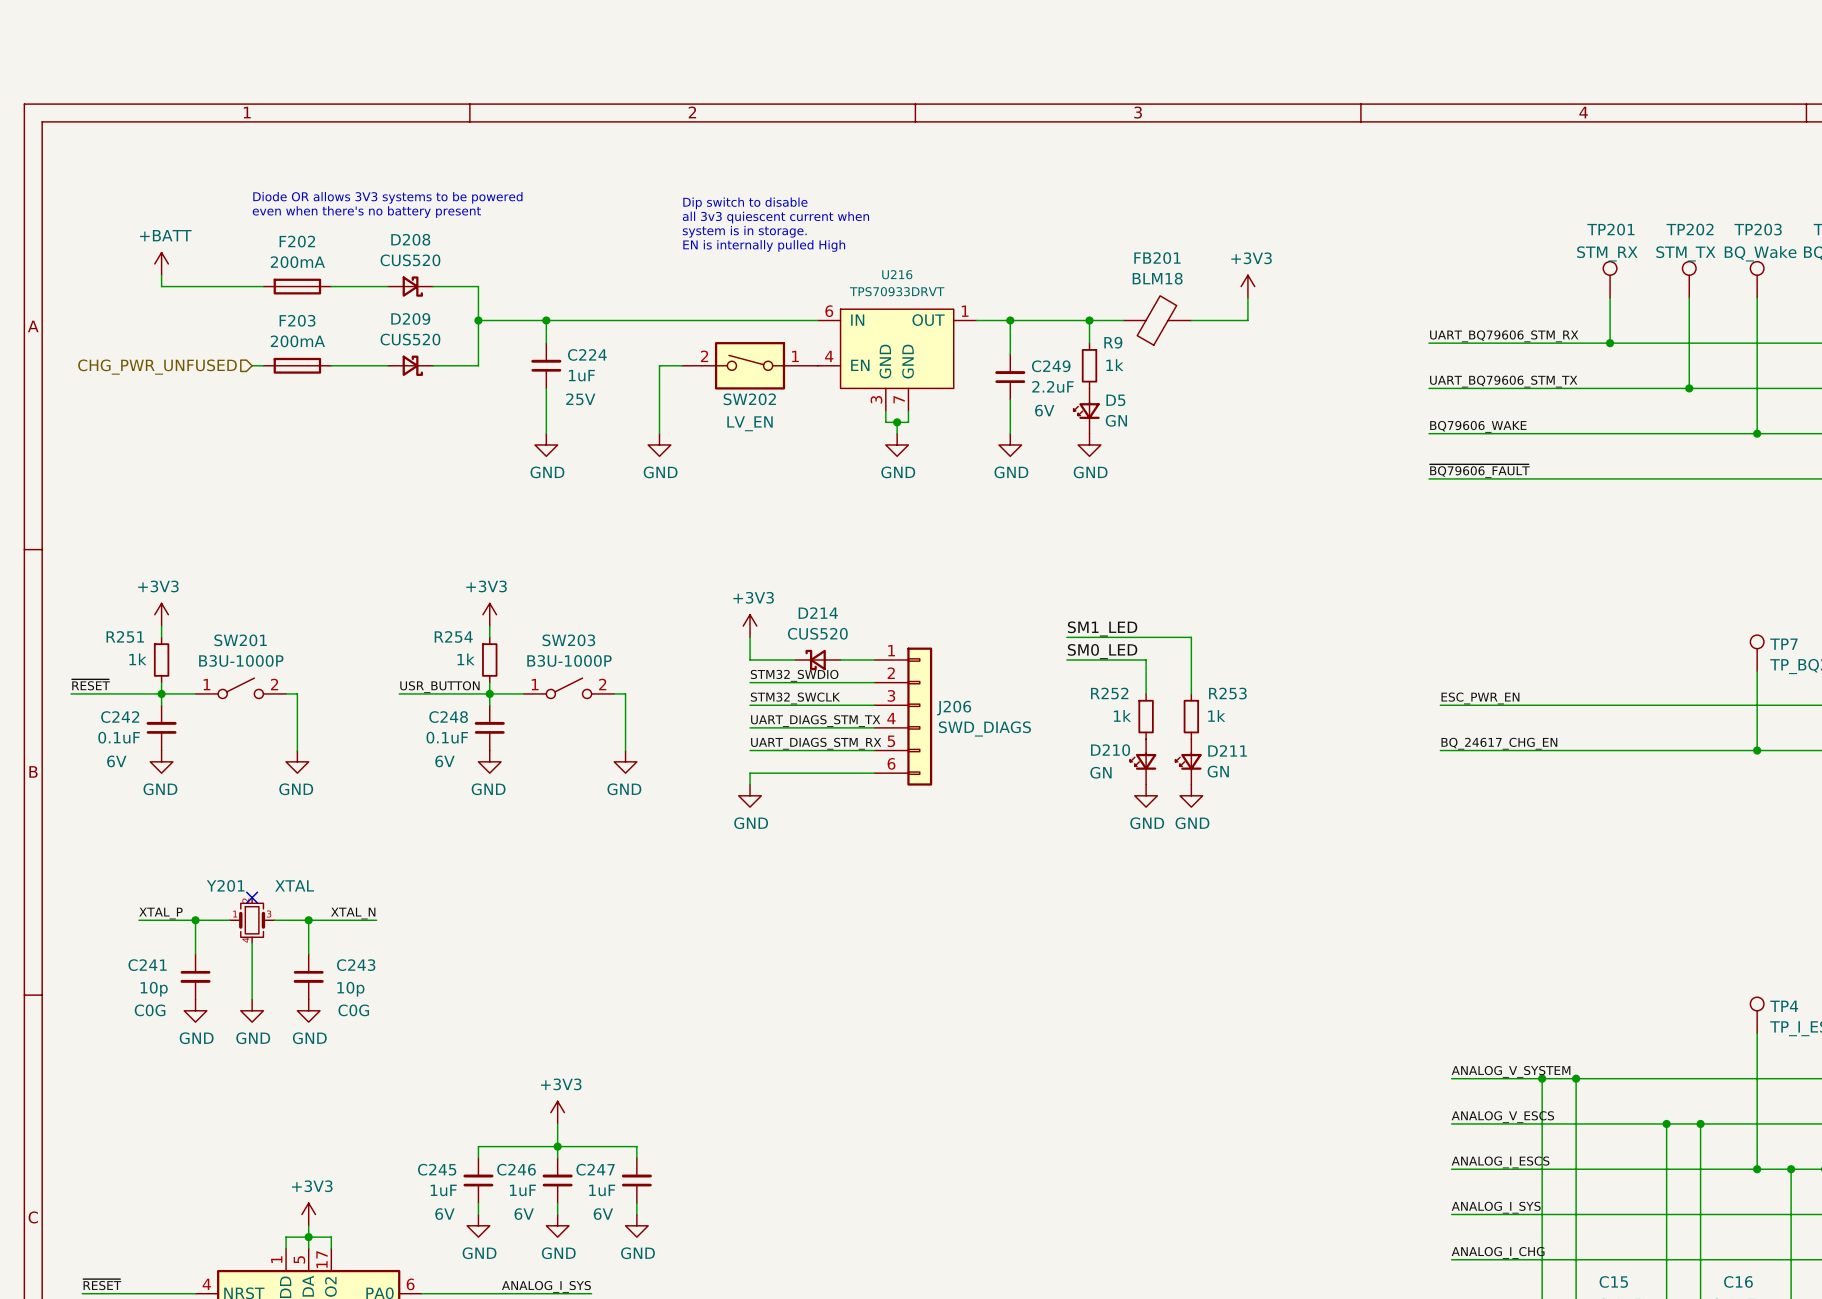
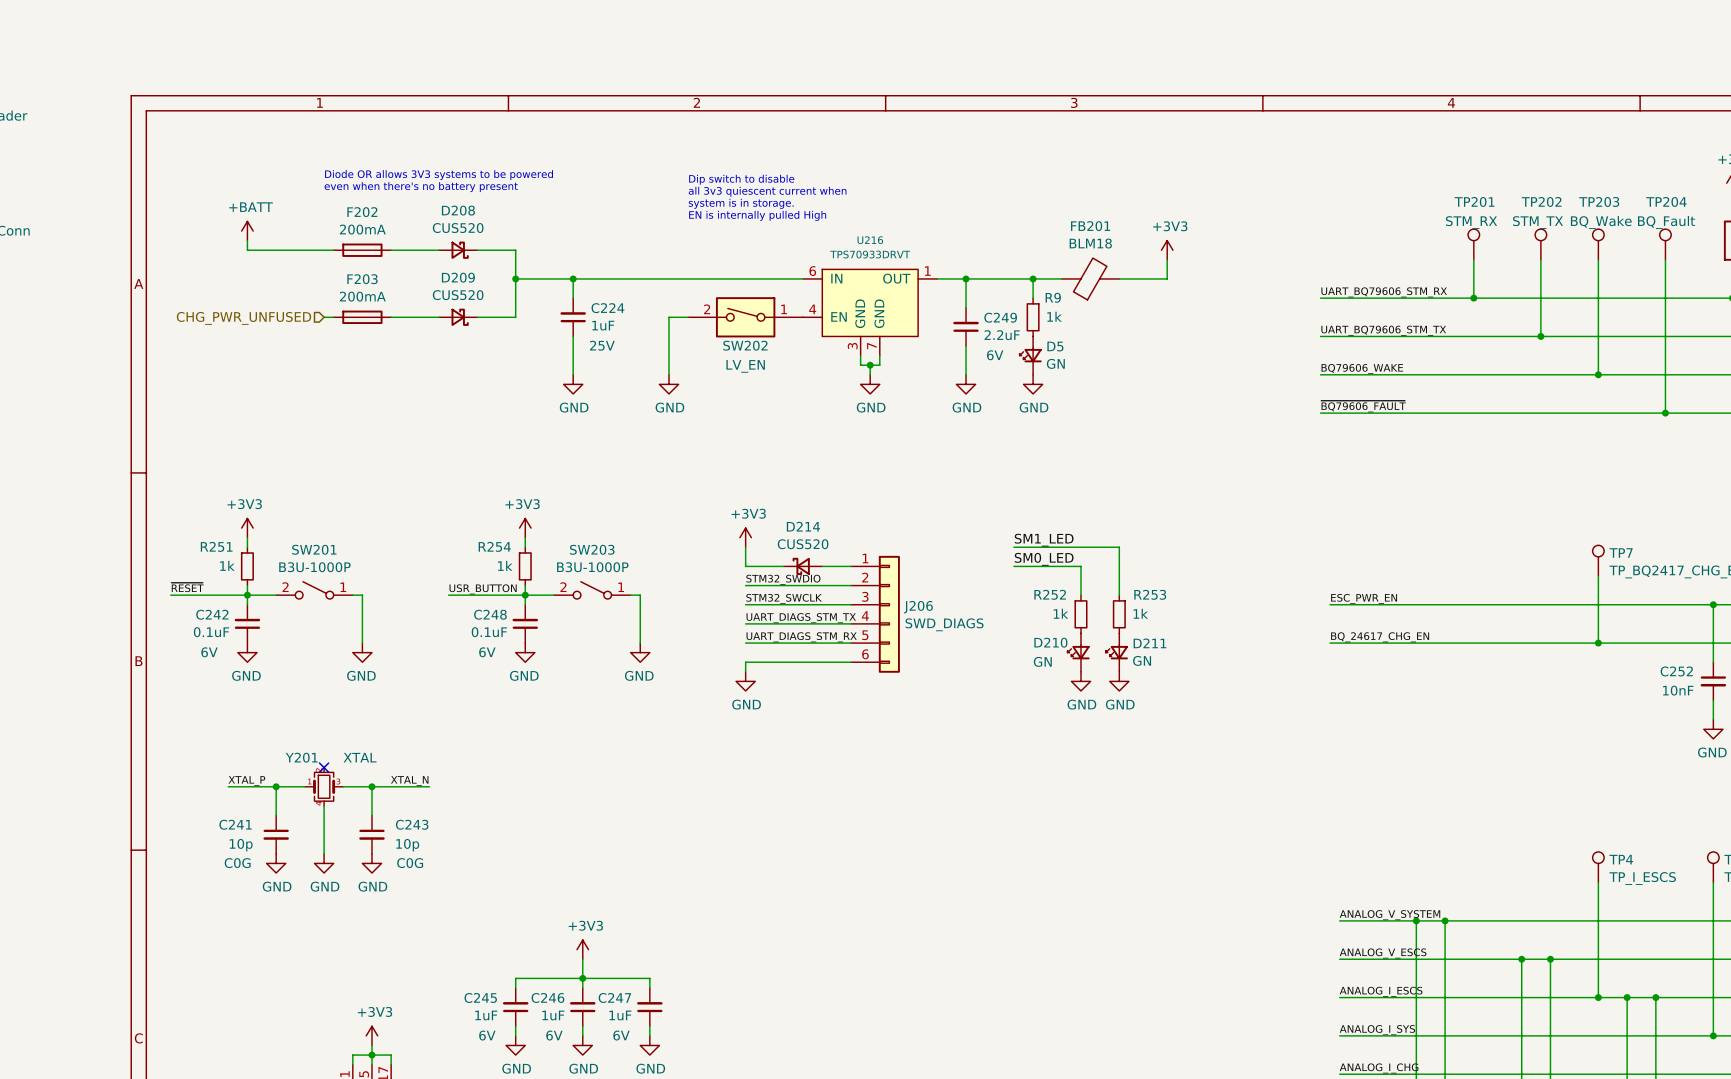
SW201 flip: as is (240, 688) -> left-right (314, 590)
SW203 flip: as is (568, 688) -> left-right (592, 590)

